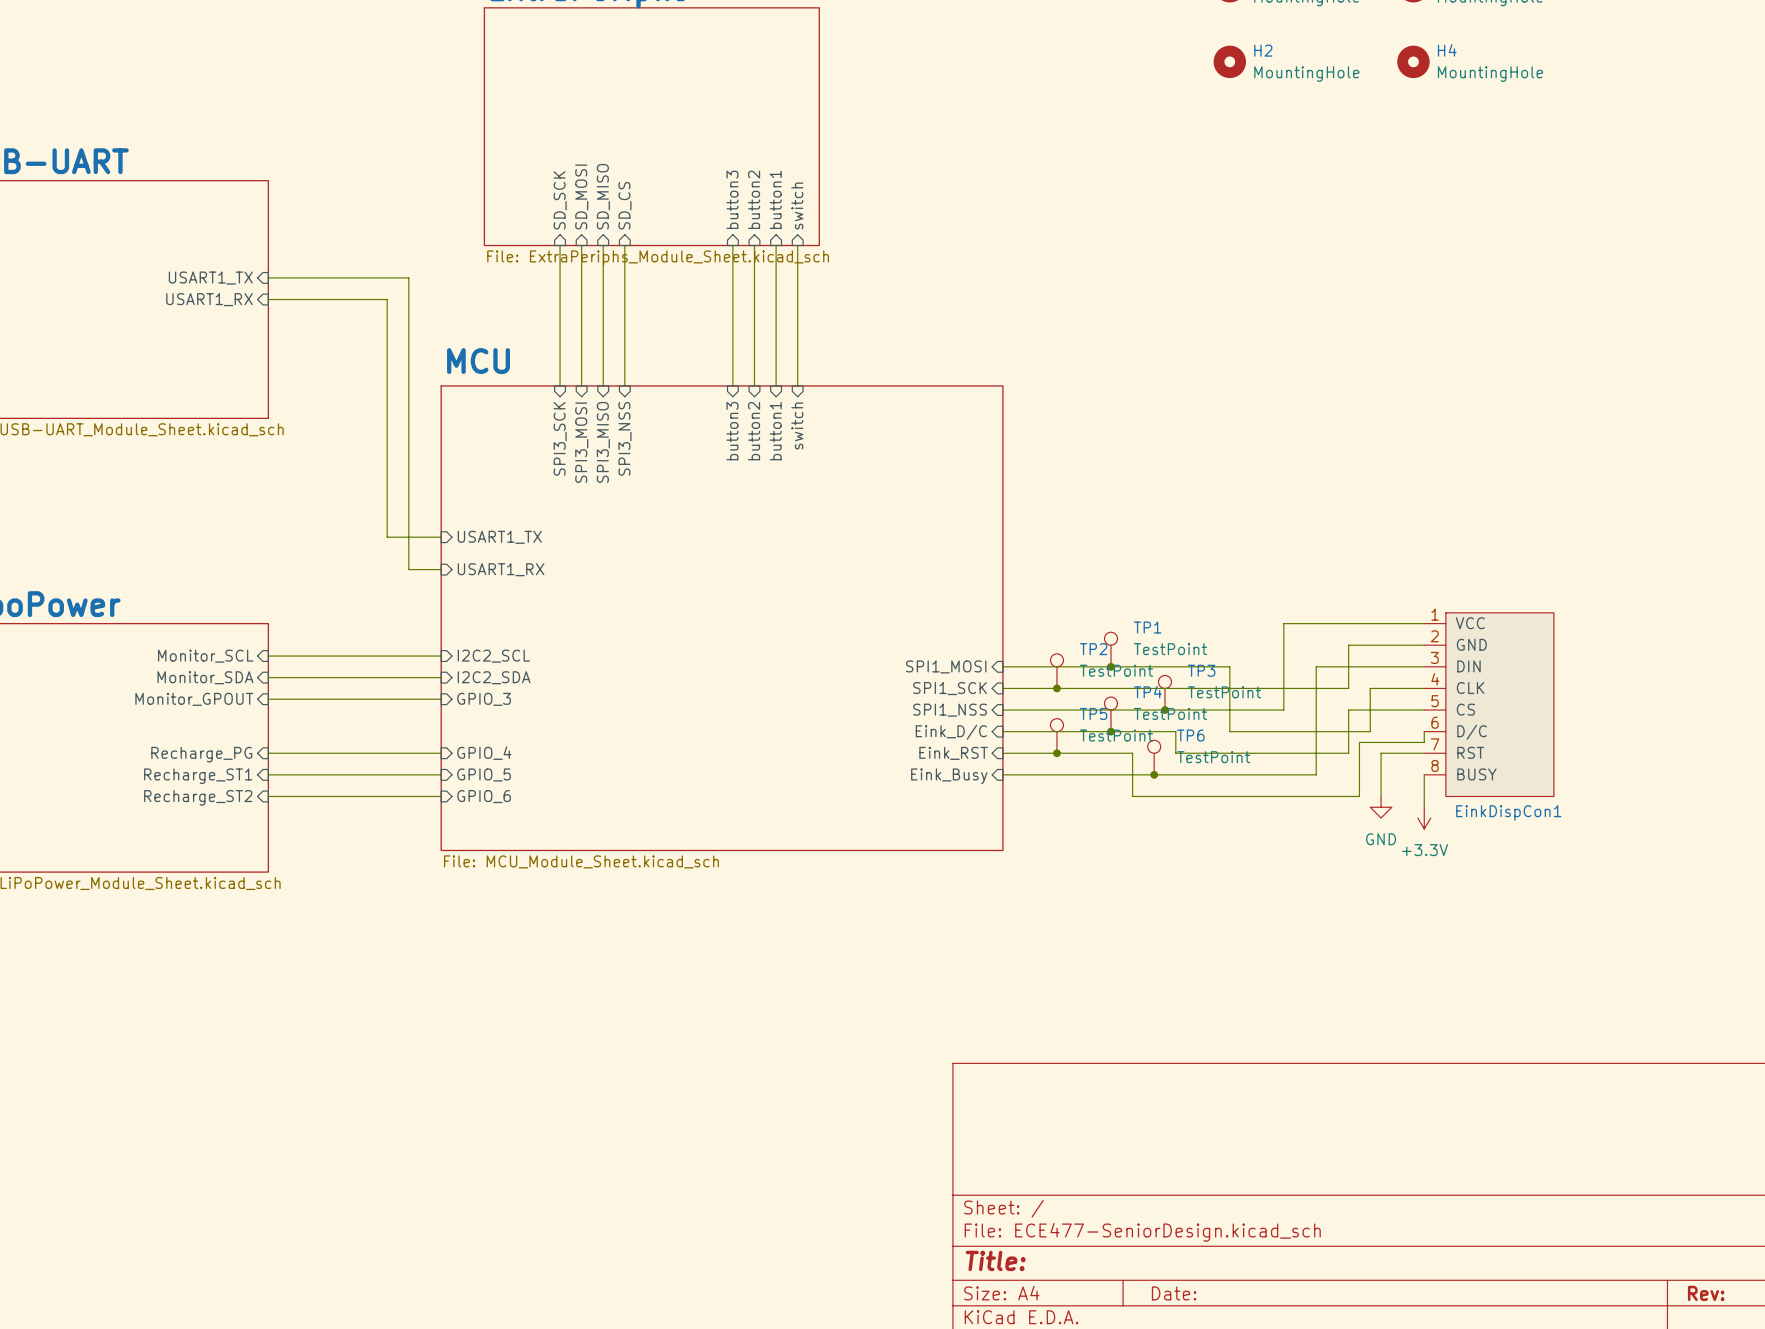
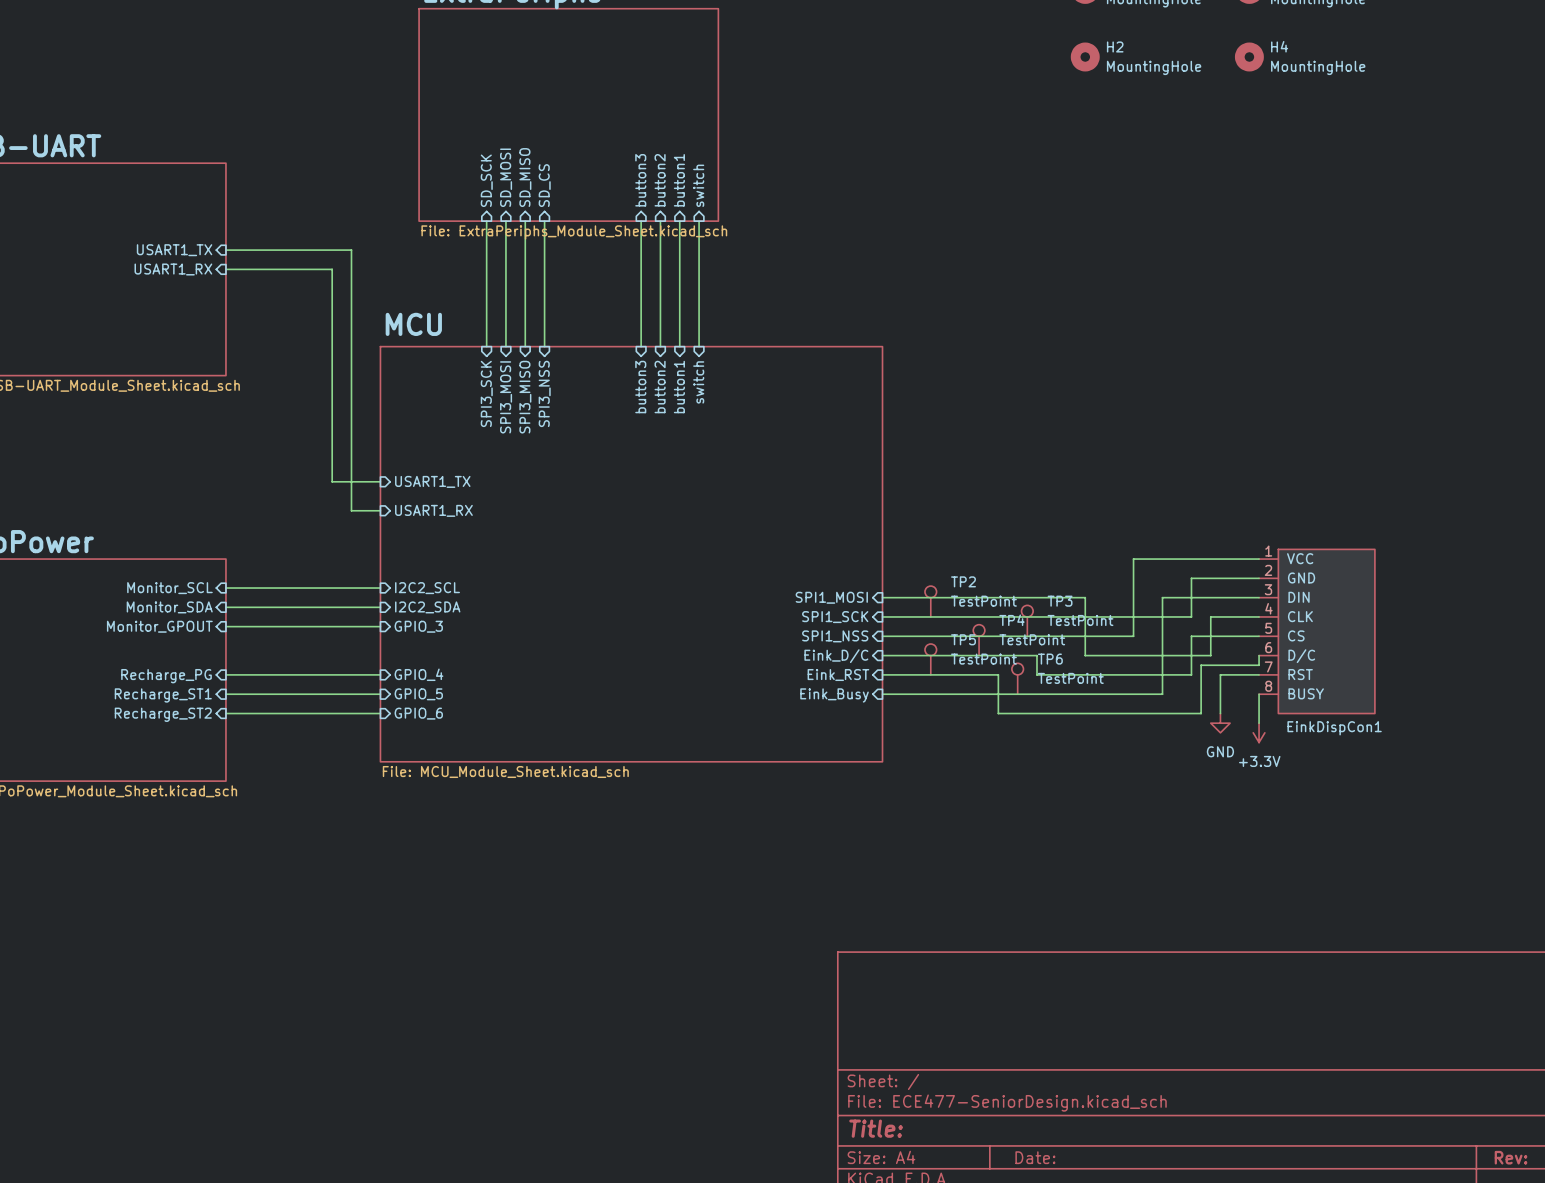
TP1: TestPoint (1110, 649) -> none
junction: (1110, 666) -> none
junction: (1056, 688) -> none
junction: (1164, 710) -> none
junction: (1110, 731) -> none
junction: (1056, 753) -> none
junction: (1154, 774) -> none

